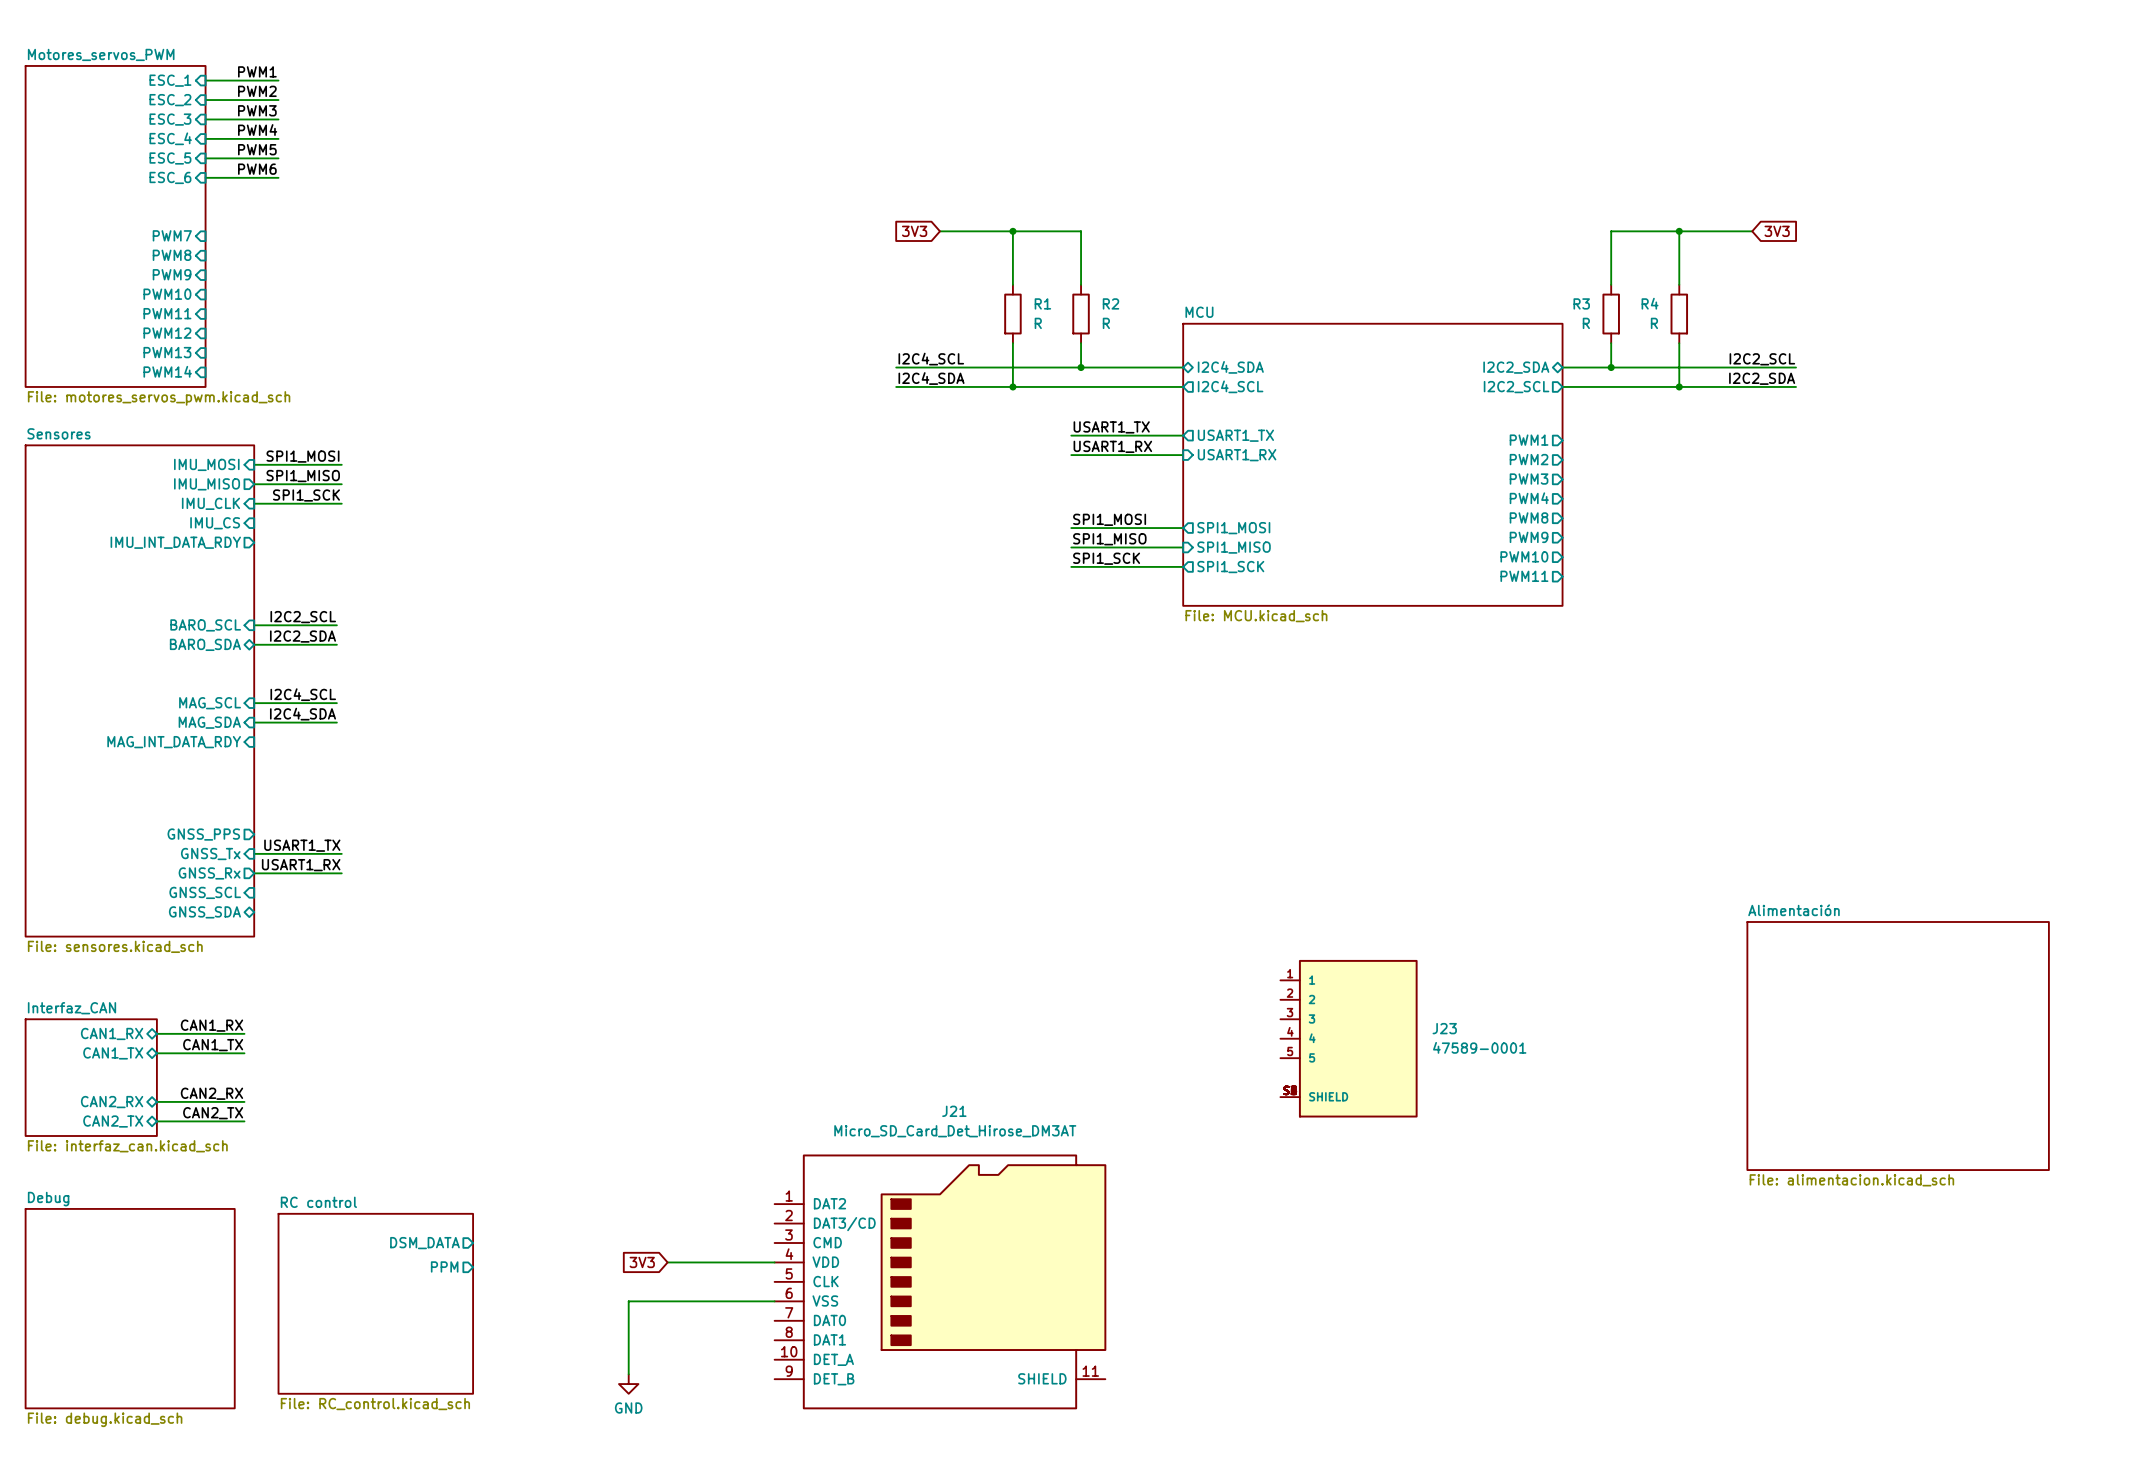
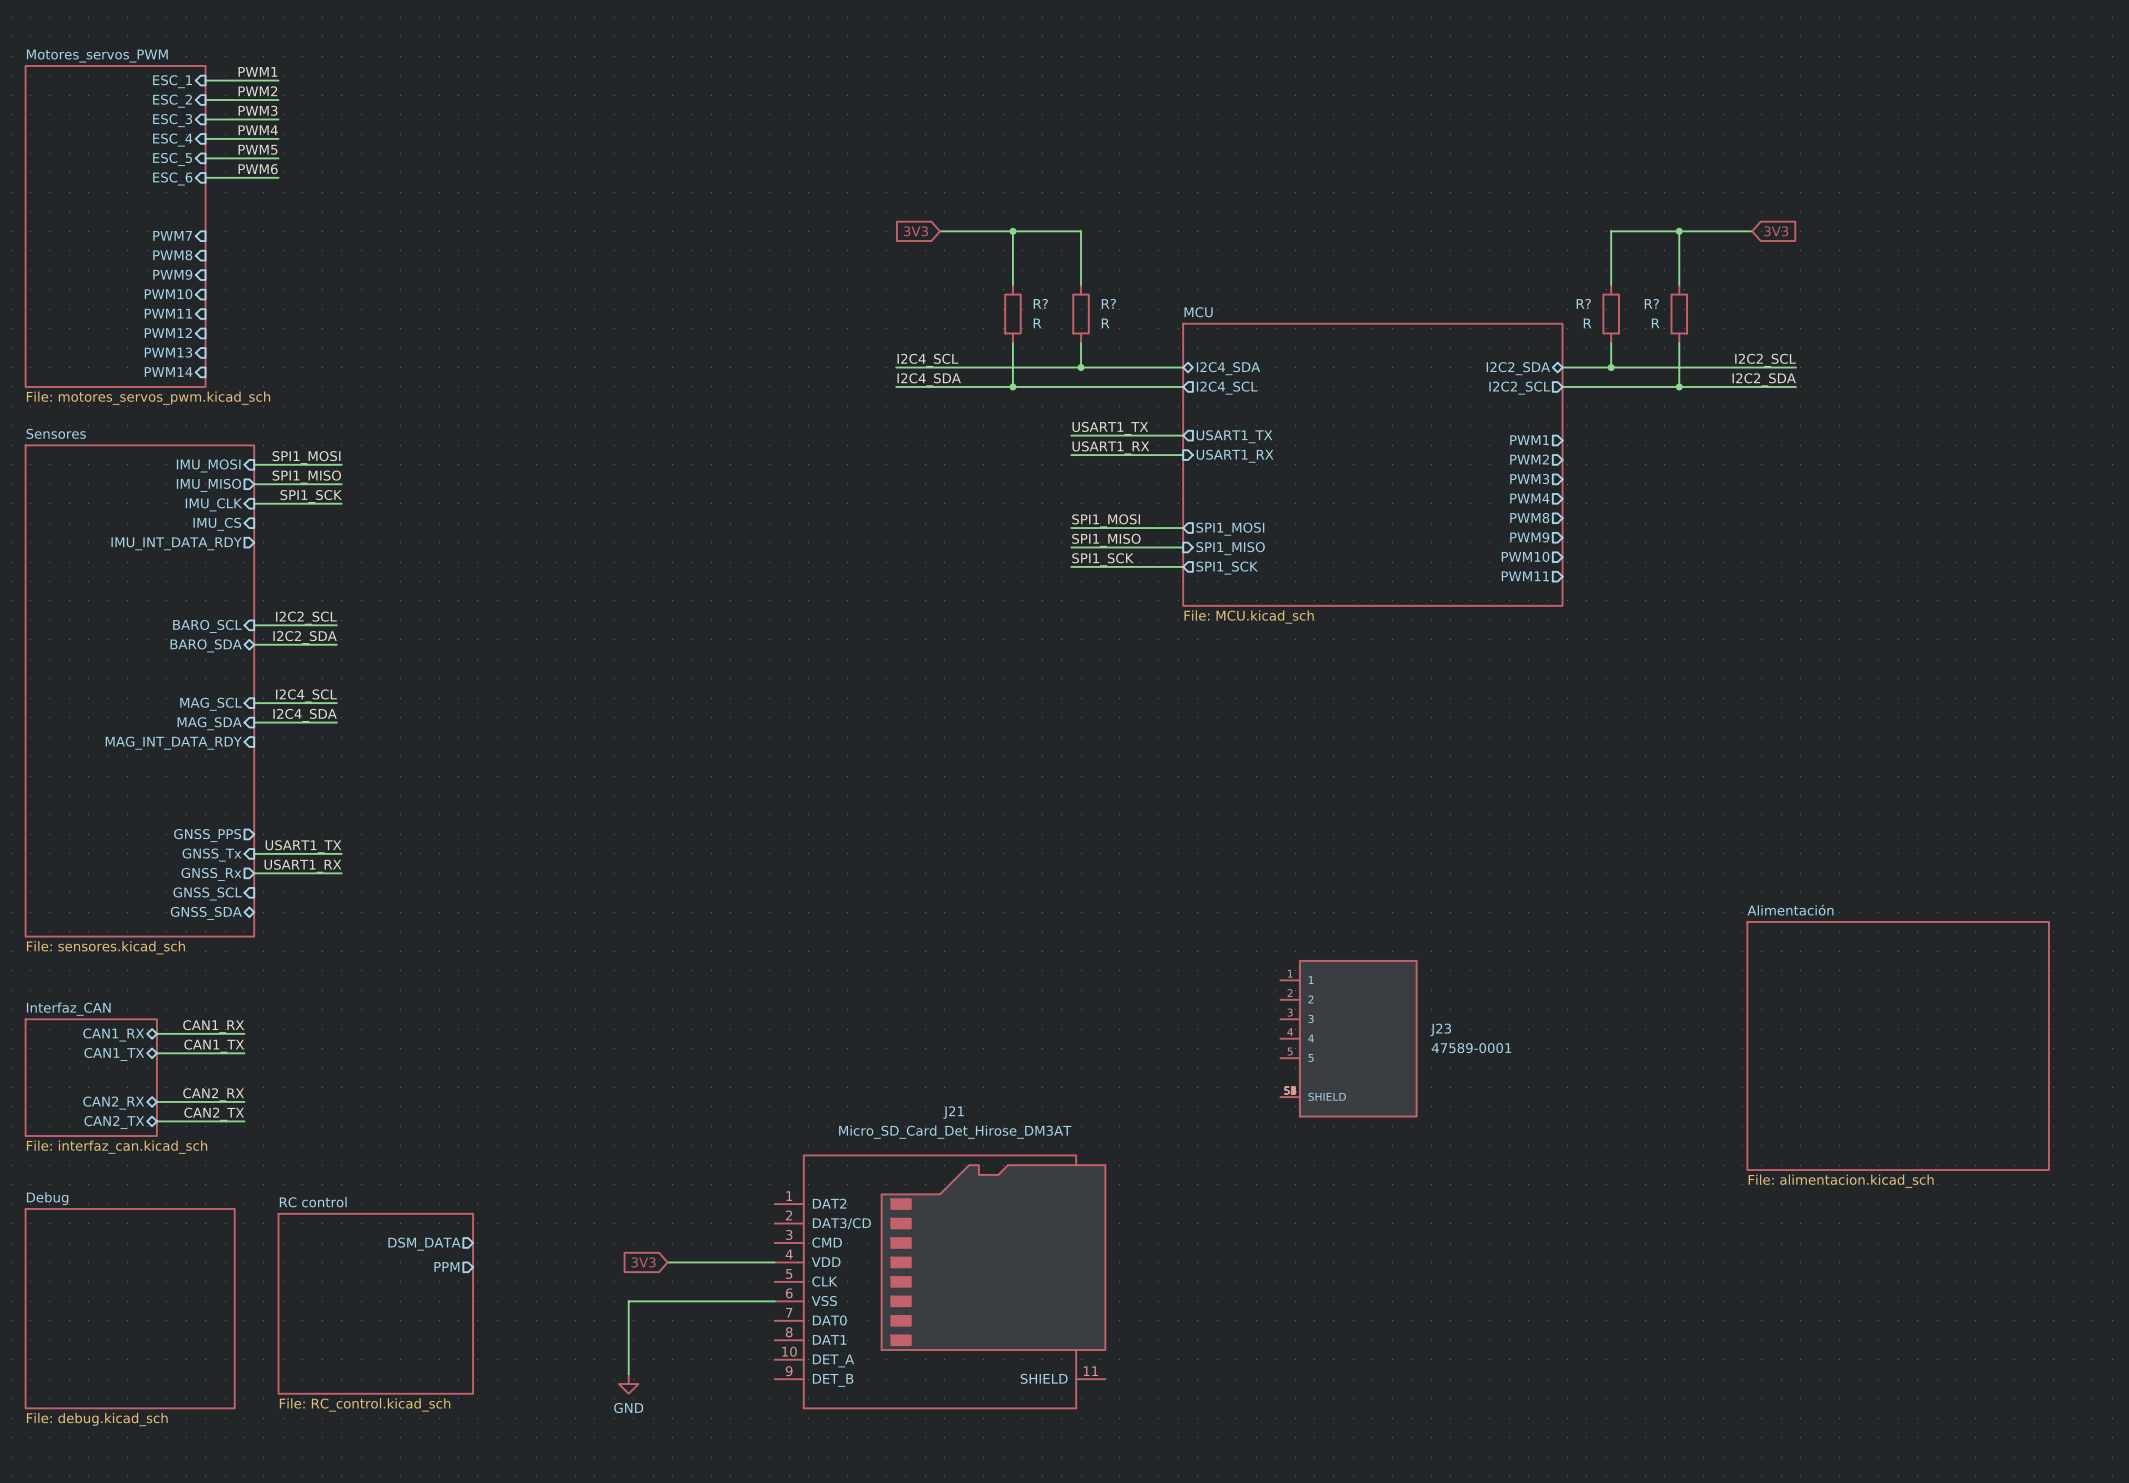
R1 name: R1 (1042, 303) -> R? (1040, 303)
R2 name: R2 (1110, 303) -> R? (1108, 303)
R3 name: R3 (1581, 303) -> R? (1583, 303)
R4 name: R4 (1650, 303) -> R? (1651, 303)

